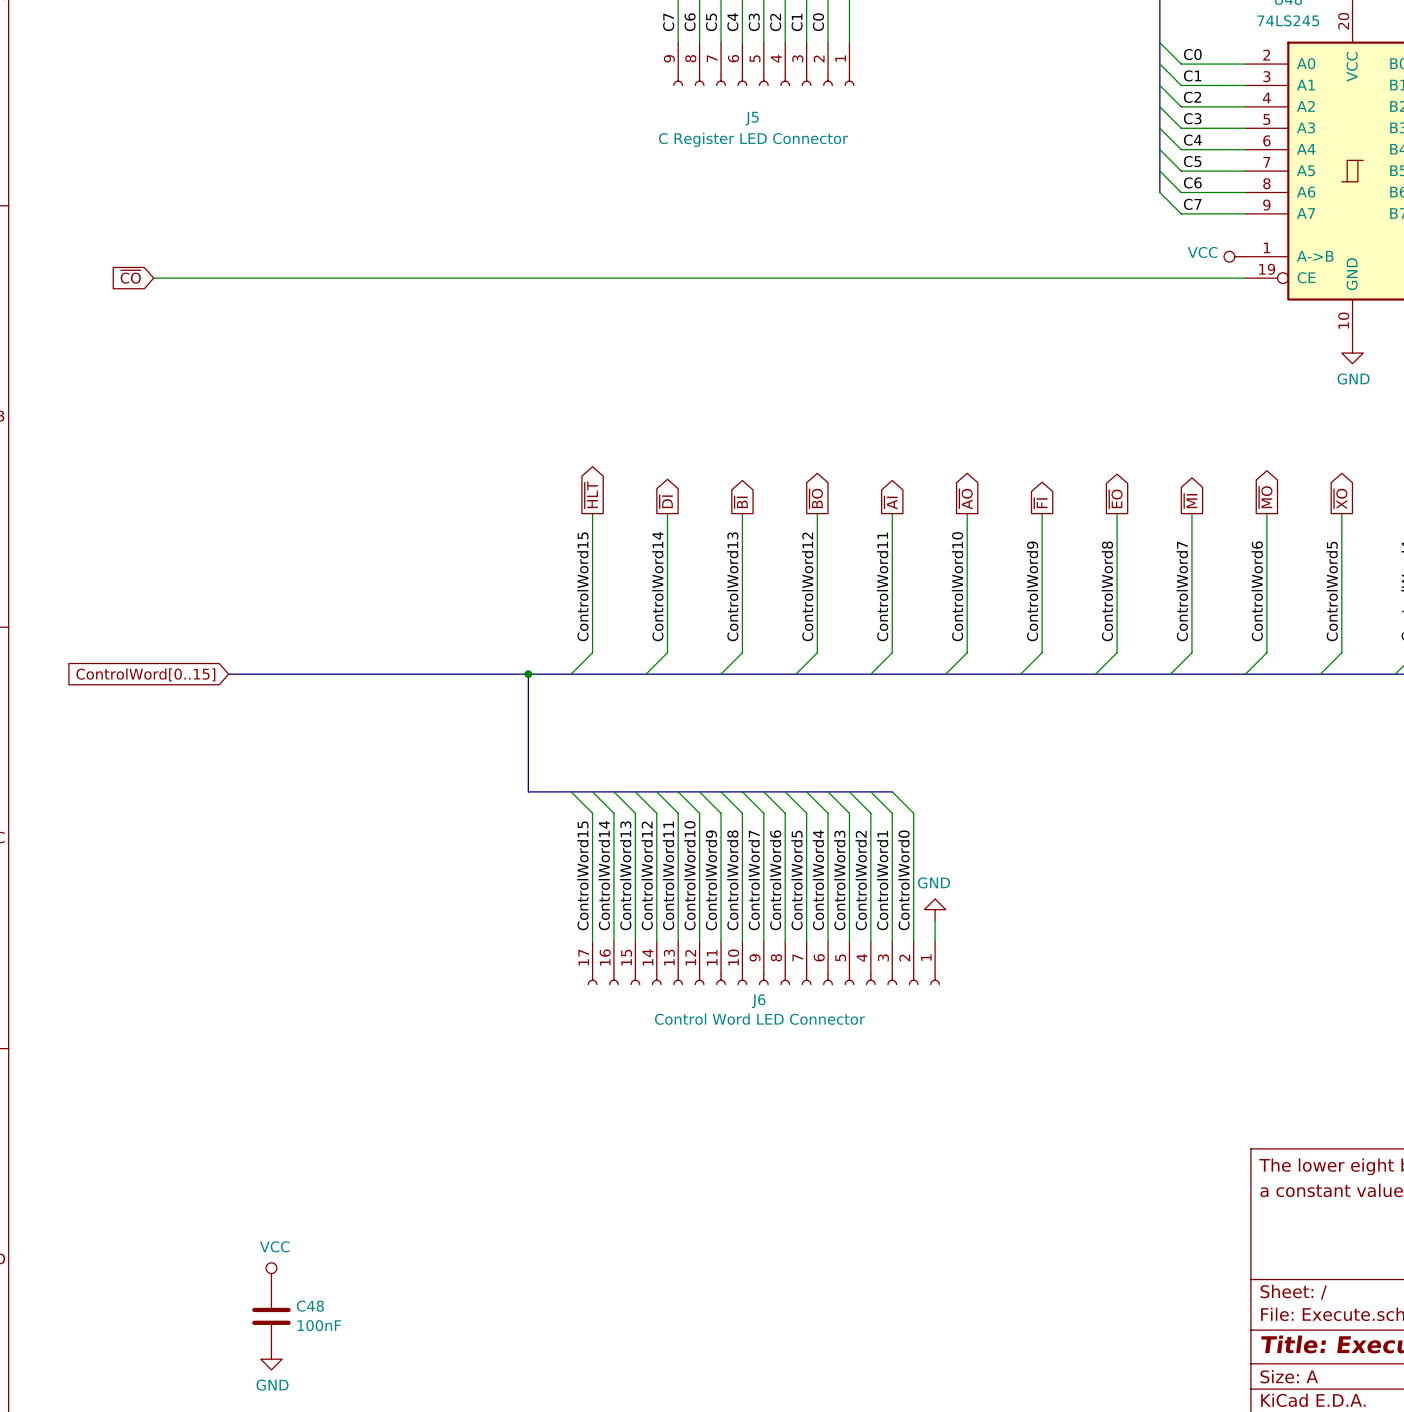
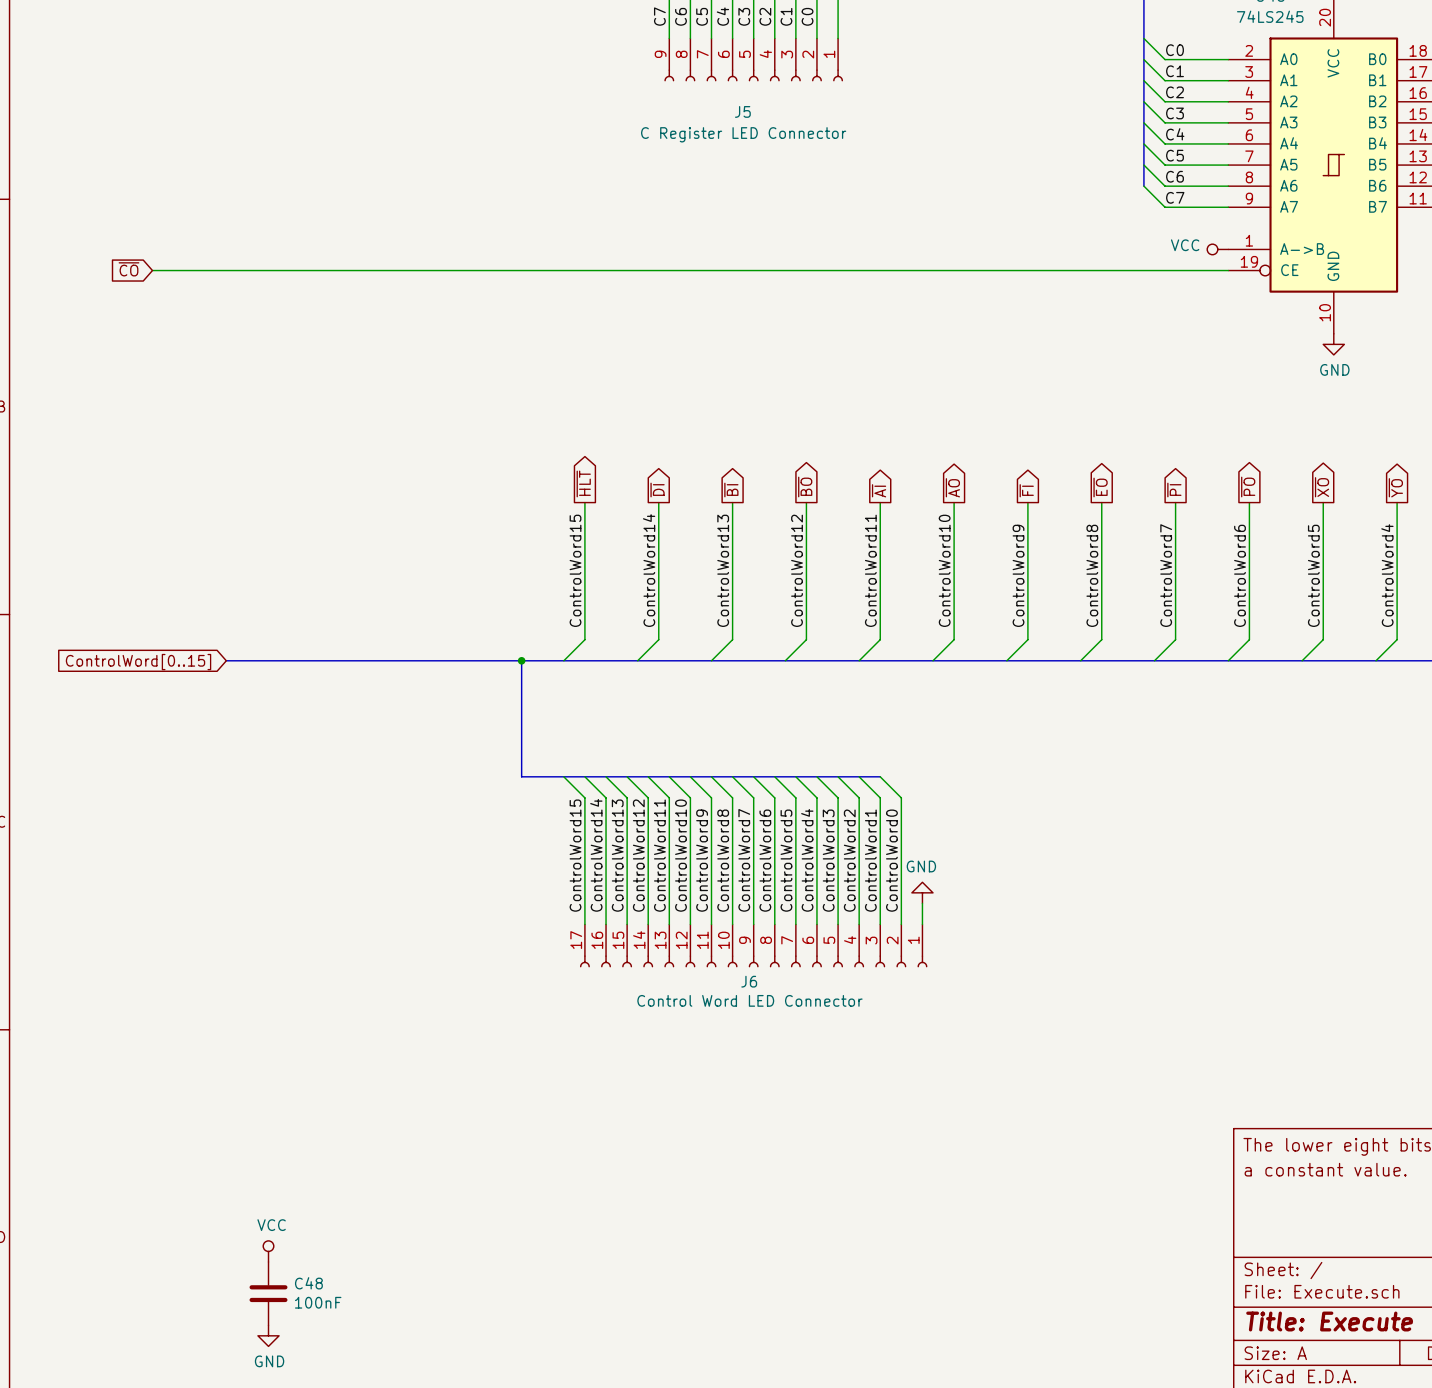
global label: ~{MO} (1265, 497) -> ~{PO} (1248, 487)
global label: ~{MI} (1190, 501) -> ~{PI} (1174, 490)

